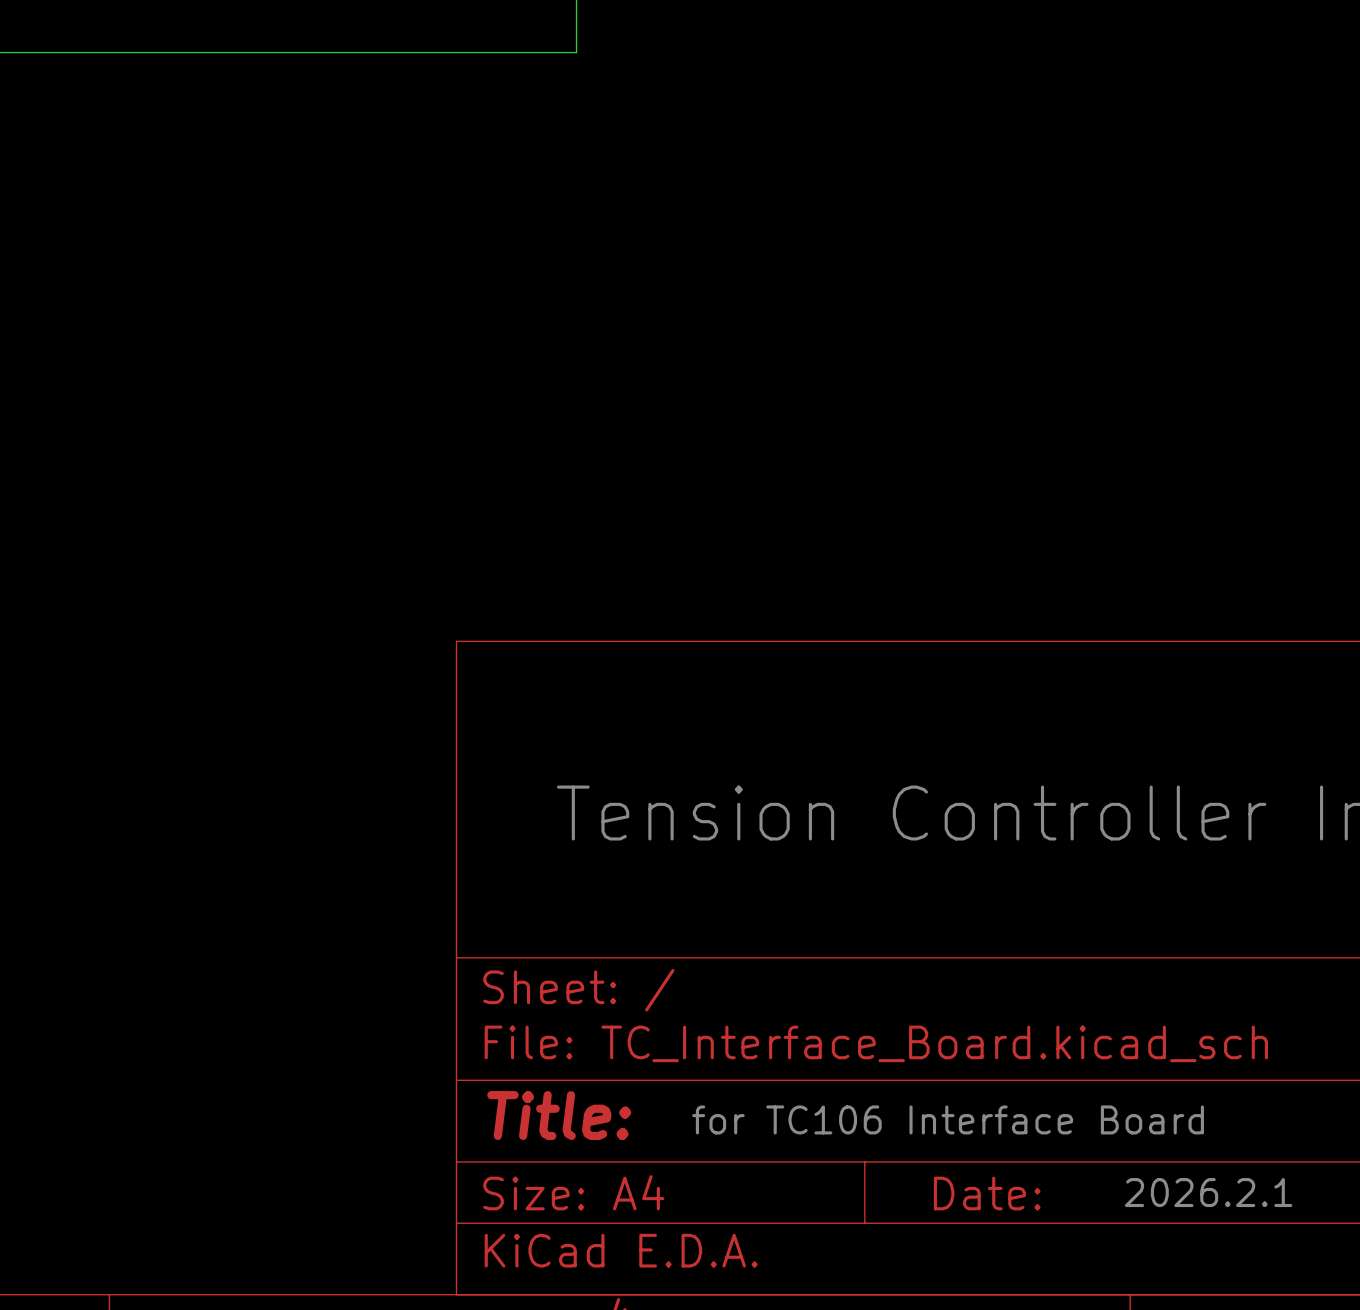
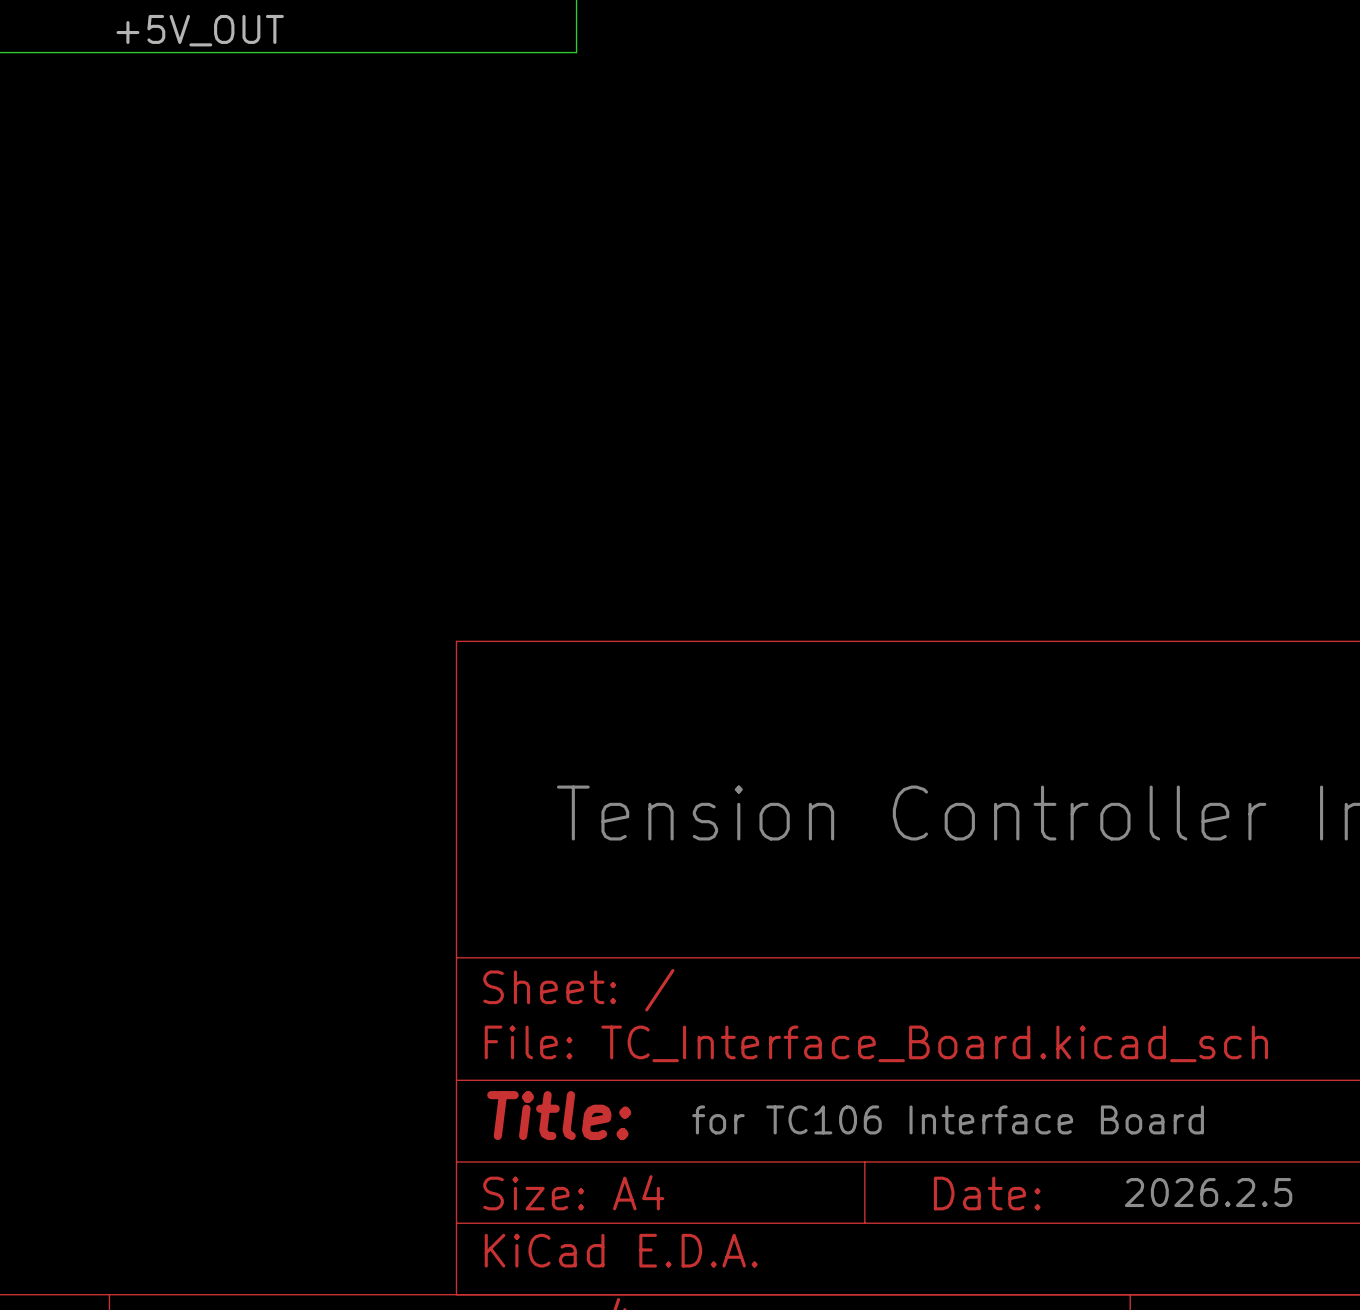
label: none -> +5V_OUT (200, 30)
text: 2026.2.1 (1208, 1192) -> 2026.2.5 (1208, 1192)

